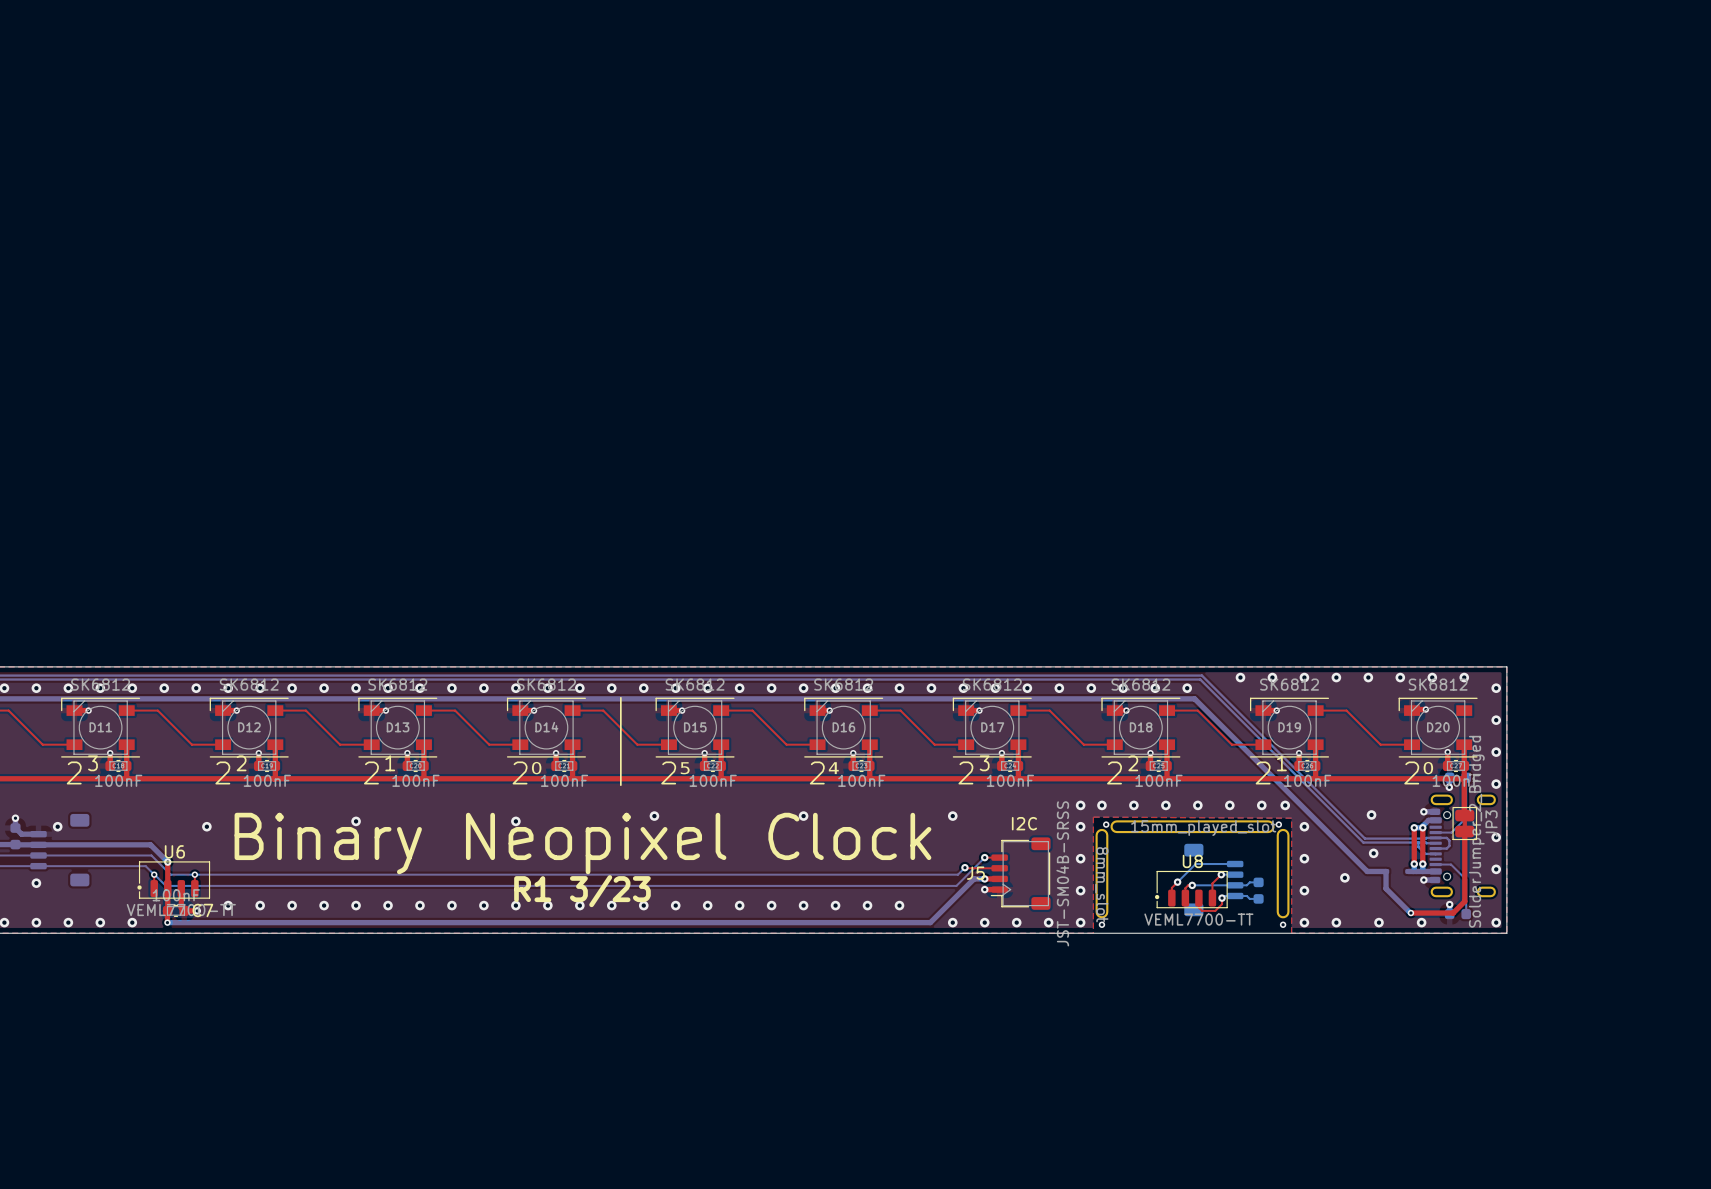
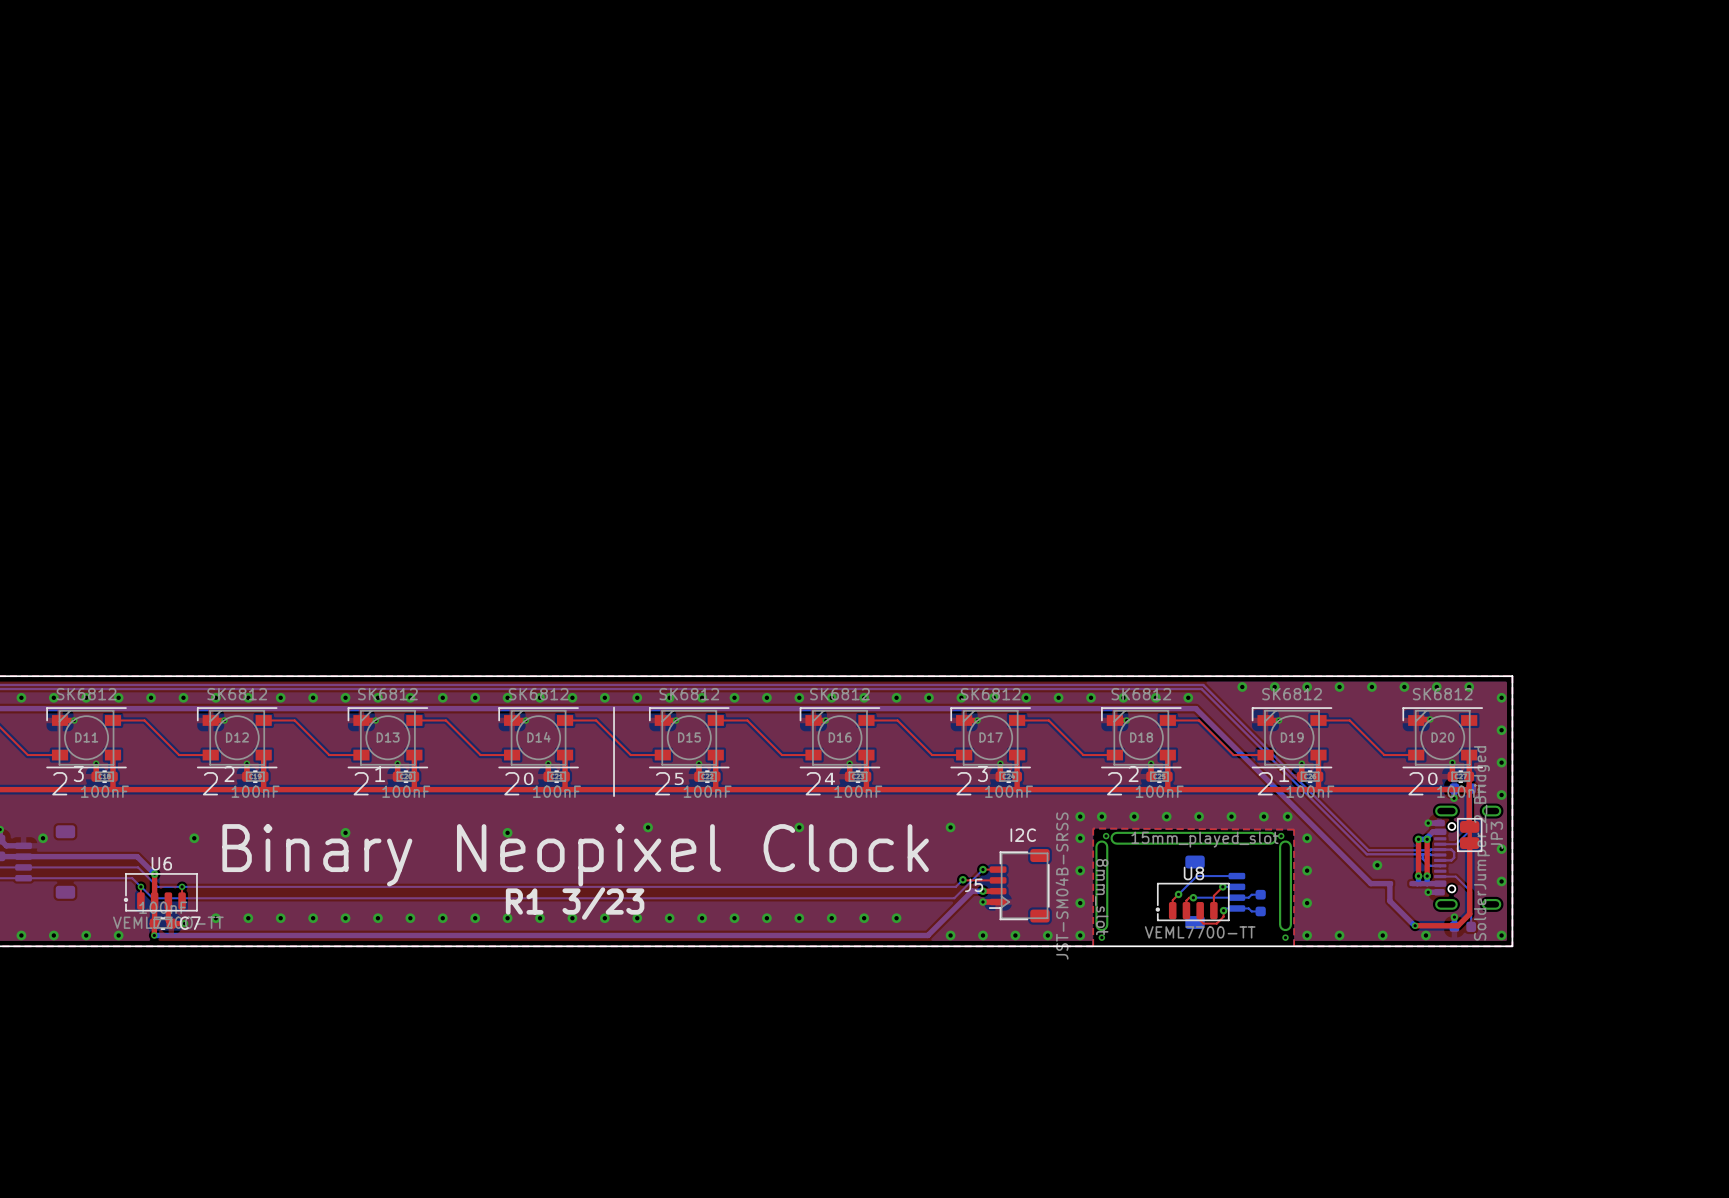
via: (1371, 815) -> none
via: (1344, 877) -> none
via: (36, 883) -> none

